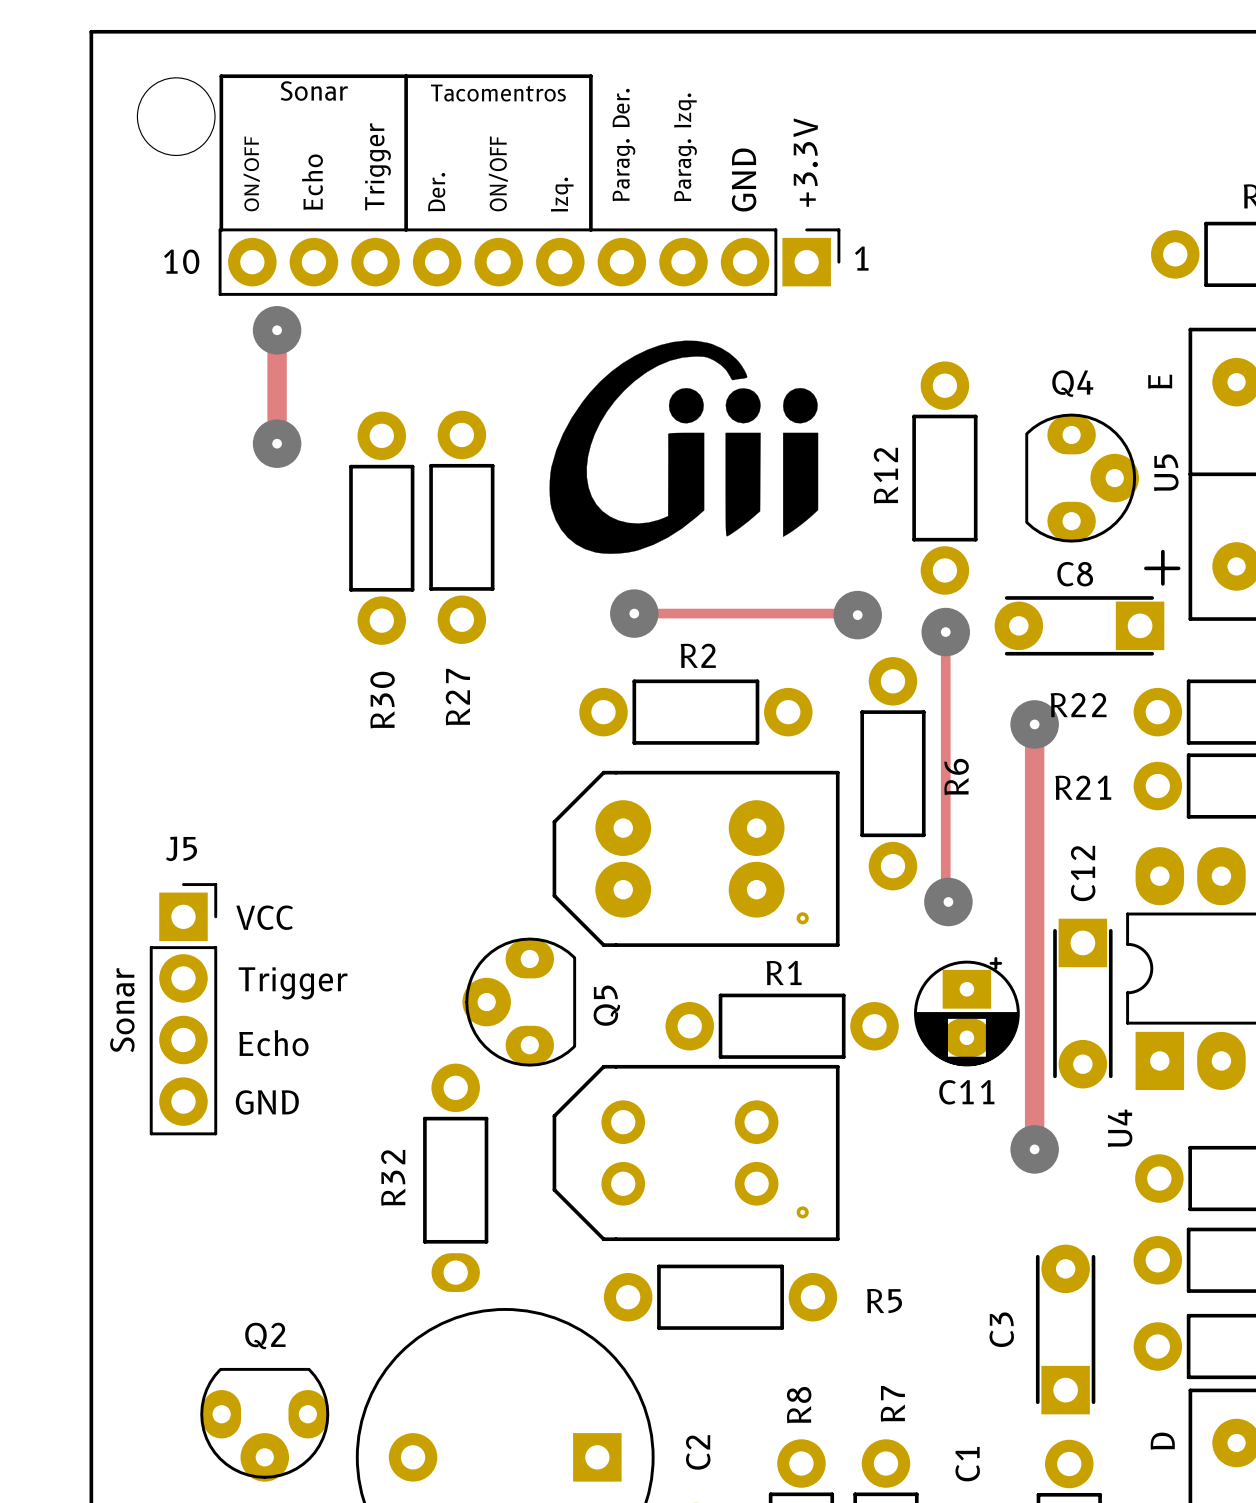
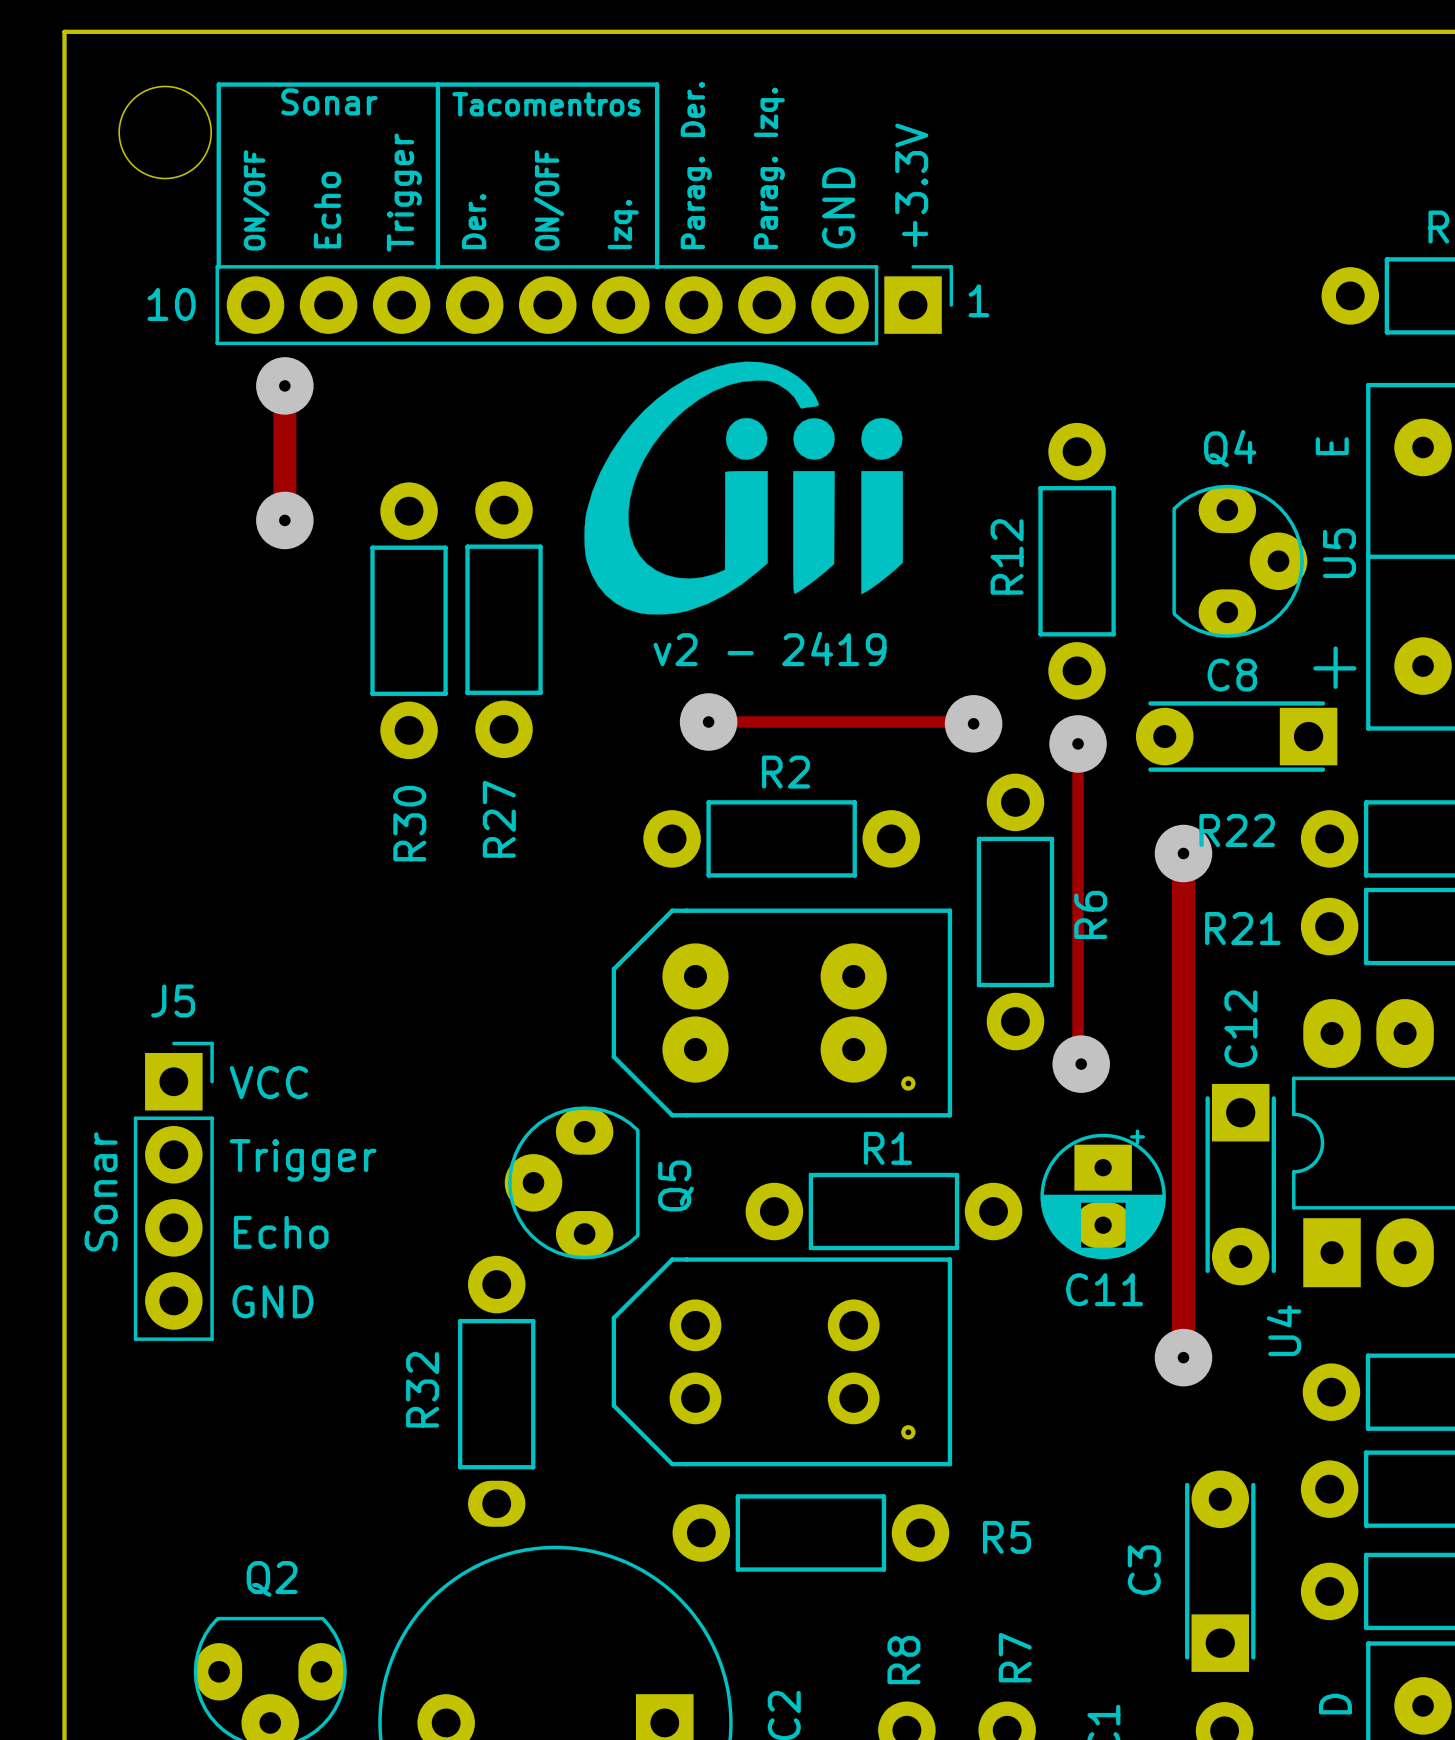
drawing position: (683, 447) -> (743, 488)
text: none -> v2 - 2419 (770, 649)

